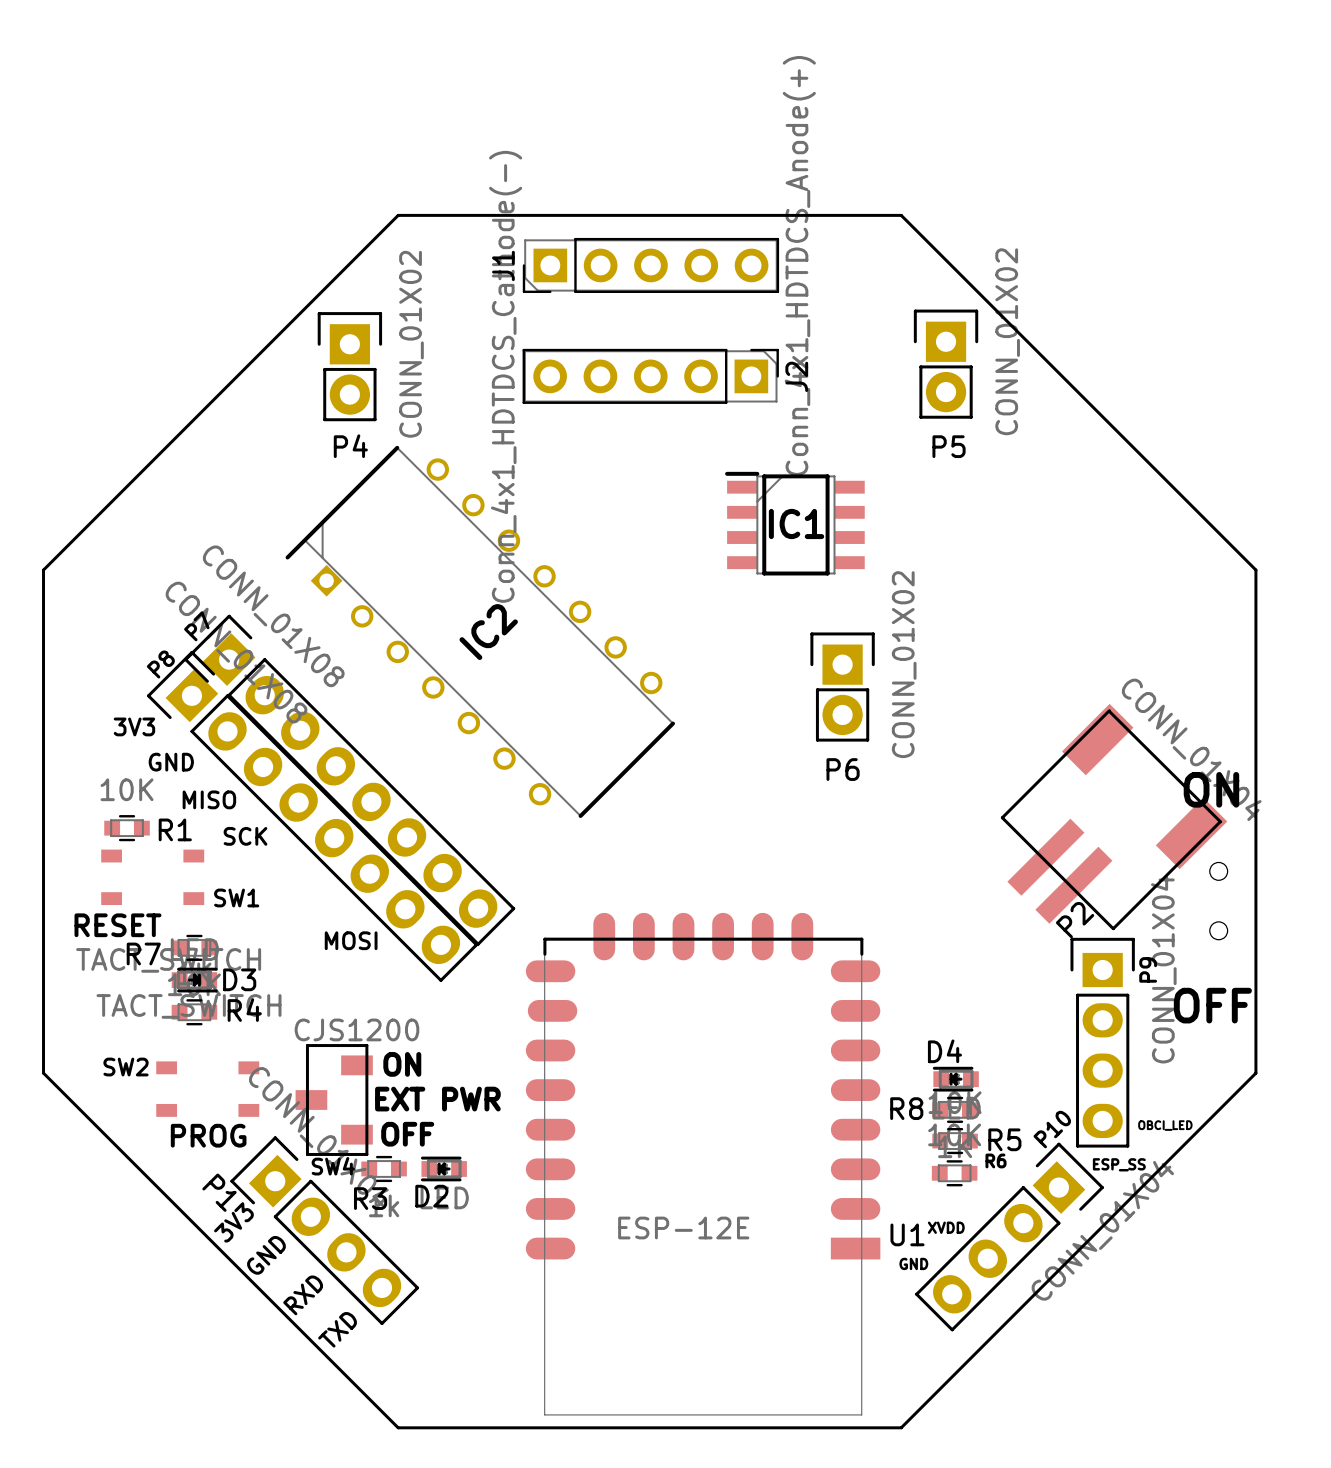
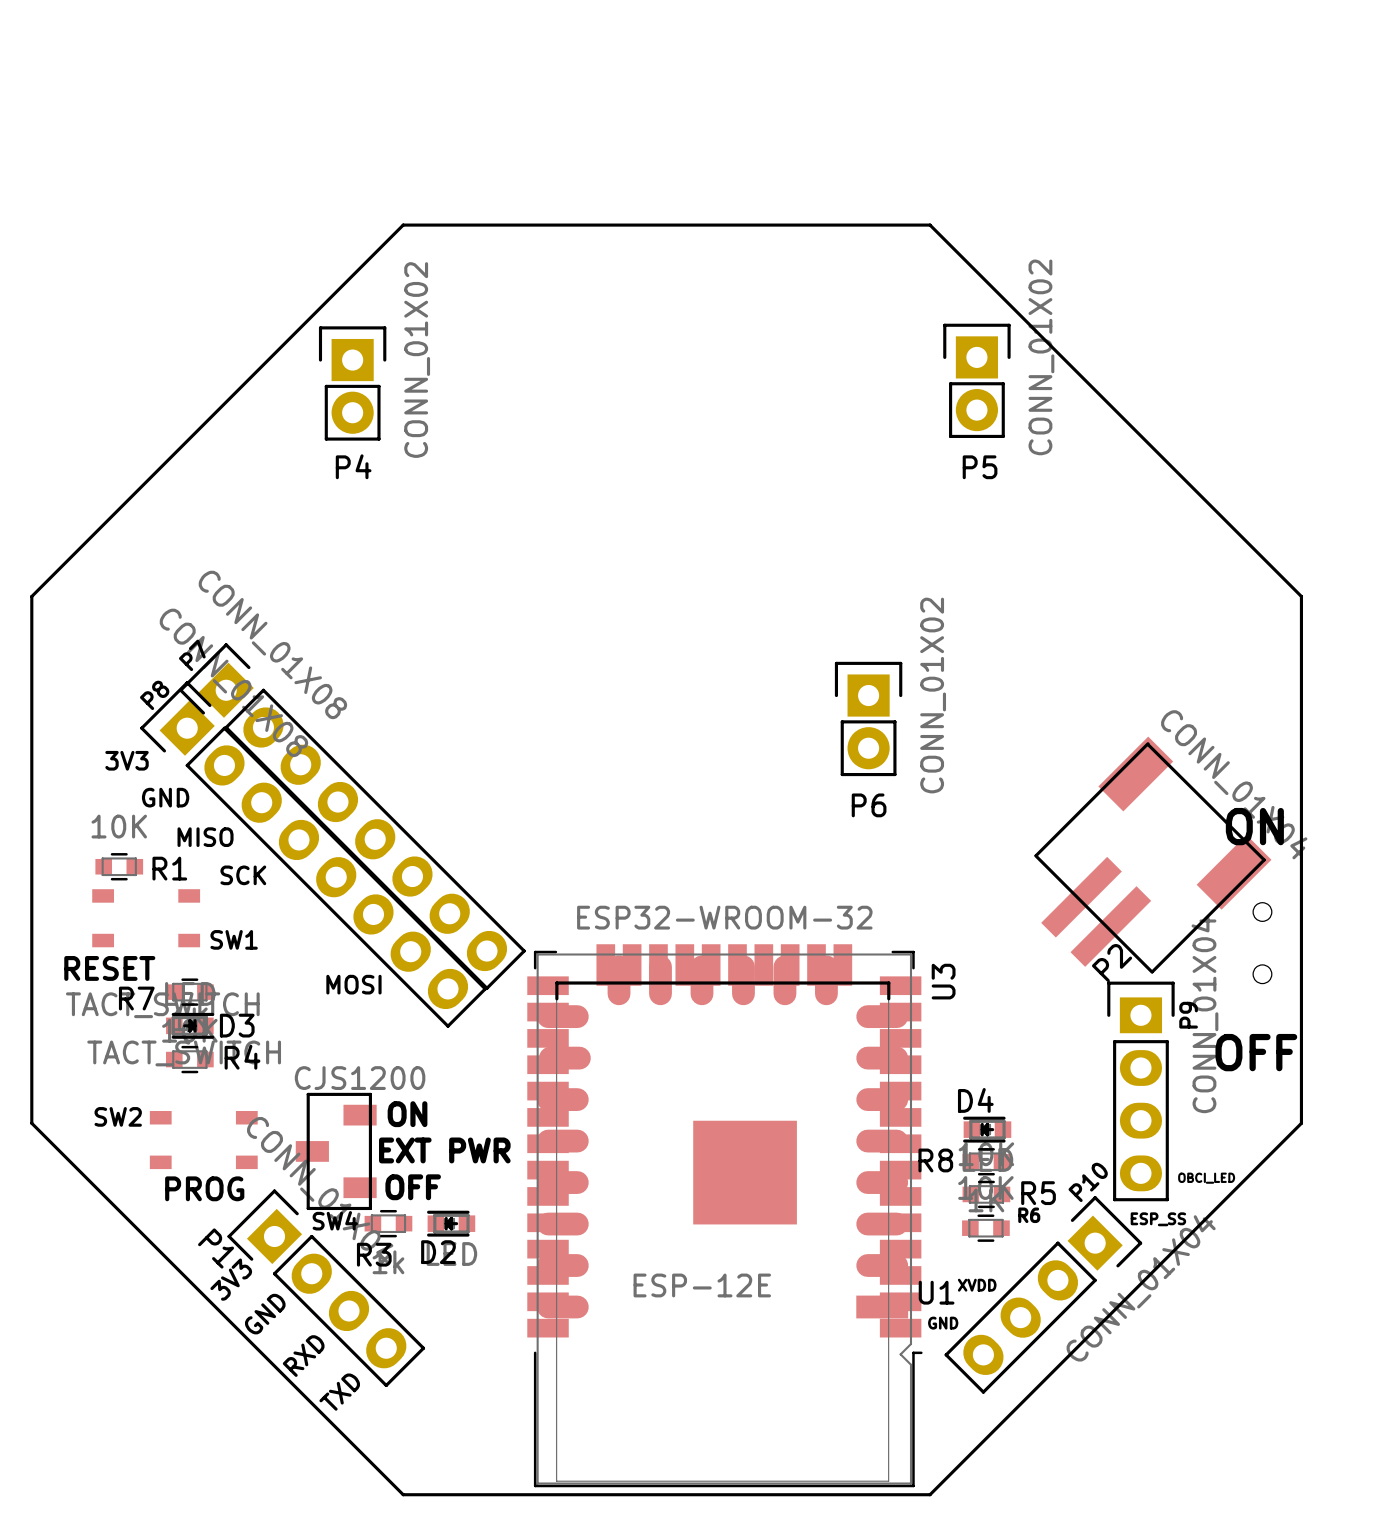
J1: Conn_4x1_HDTDCS_Anode(+) (650, 265) -> none
J2: Conn_4x1_HDTDCS_Cathode(-) (650, 376) -> none
IC1: (794, 523) -> none
IC2: (480, 631) -> none
U3: none -> ESP32-WROOM-32 (724, 1215)

